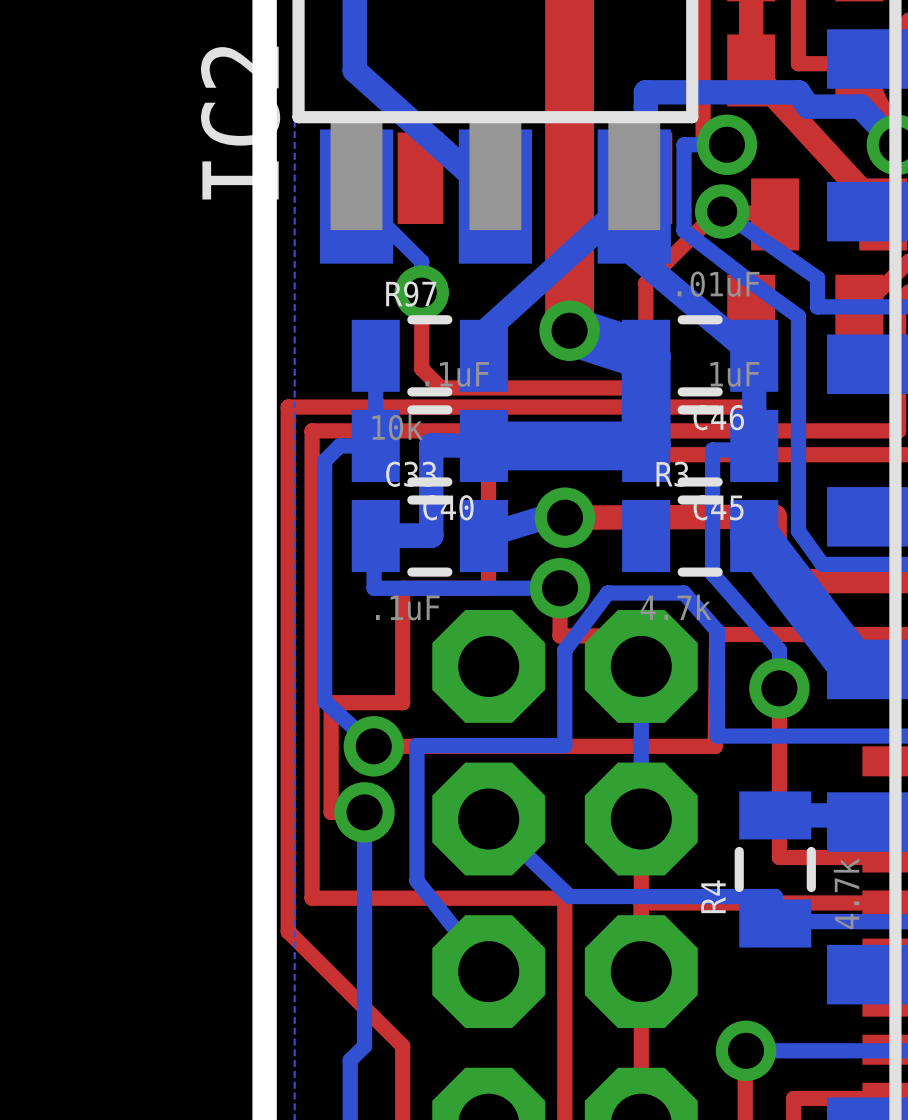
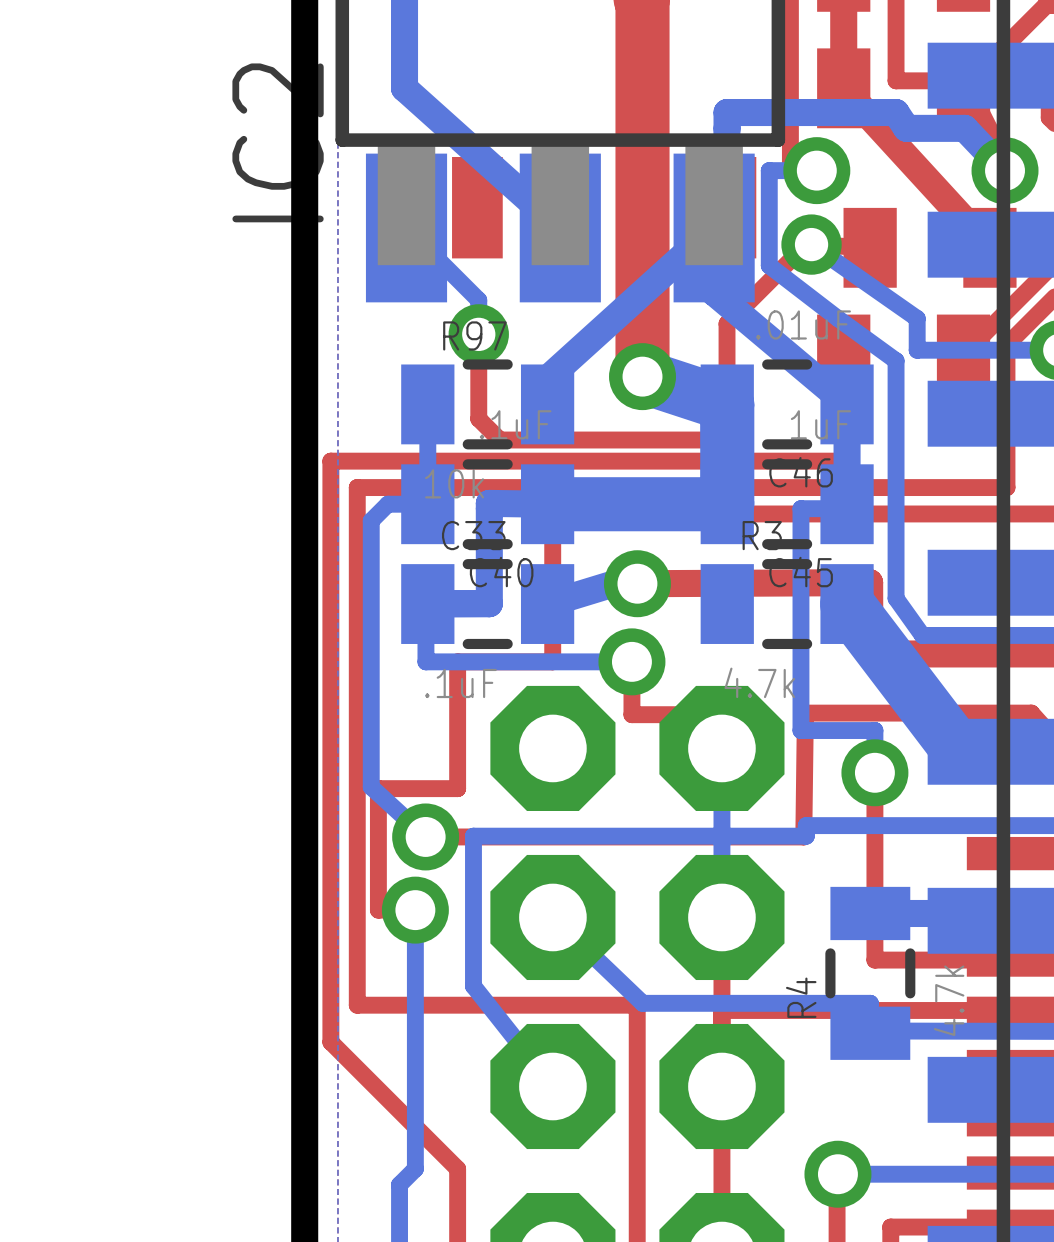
bottom track: (712, 573) (779, 650) -> (800, 646) (800, 730) (874, 730)
bottom track: (717, 736) (717, 631) (684, 593) (607, 593) (564, 650) (564, 745) -> (806, 825) (806, 836) (637, 836)

